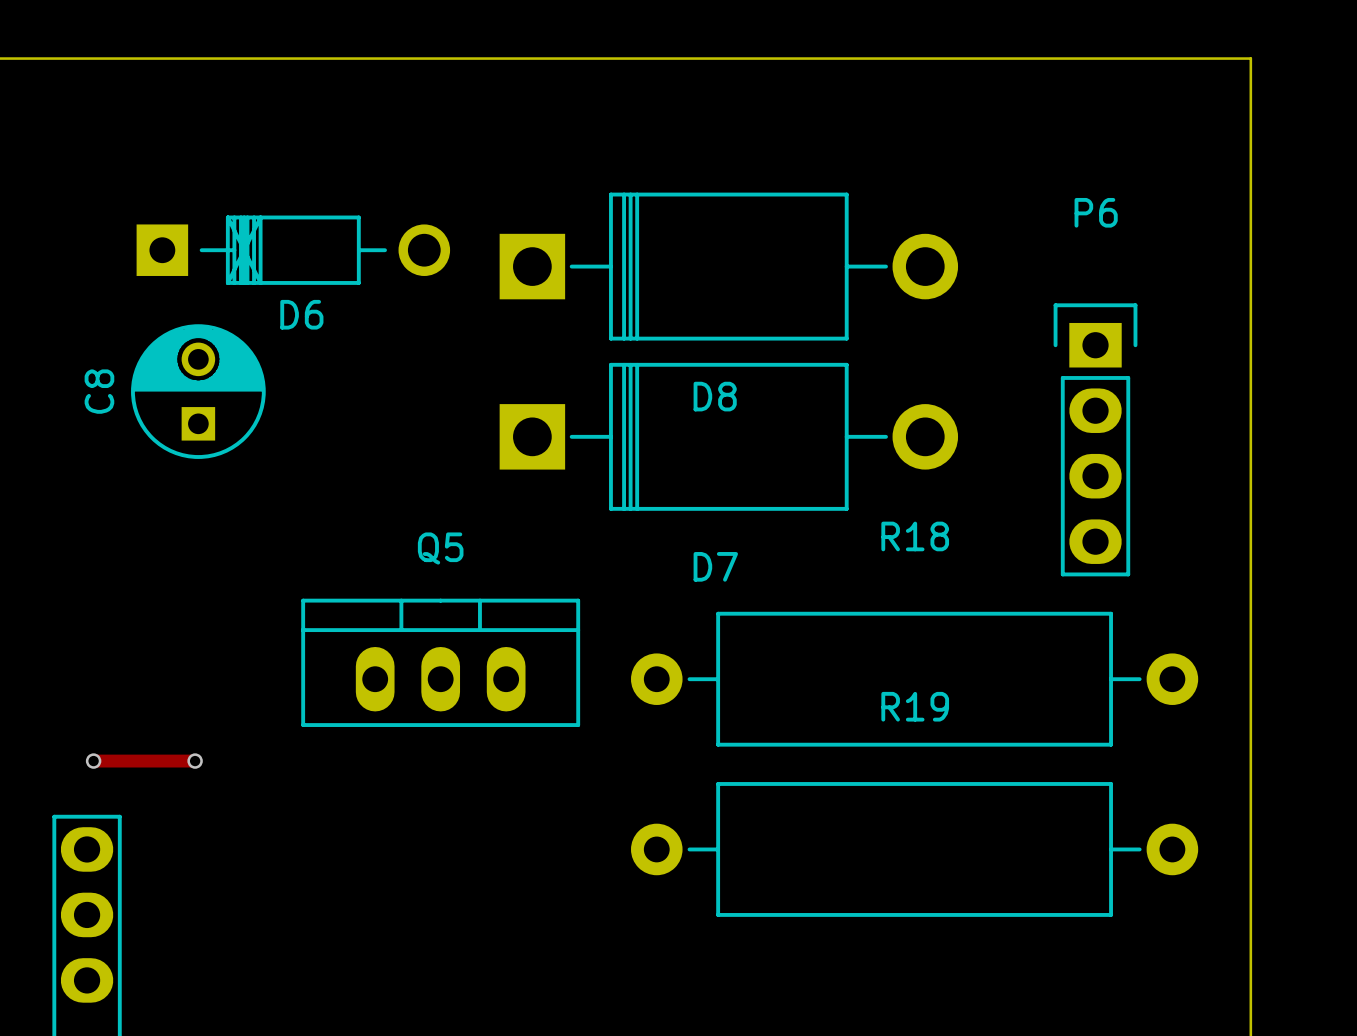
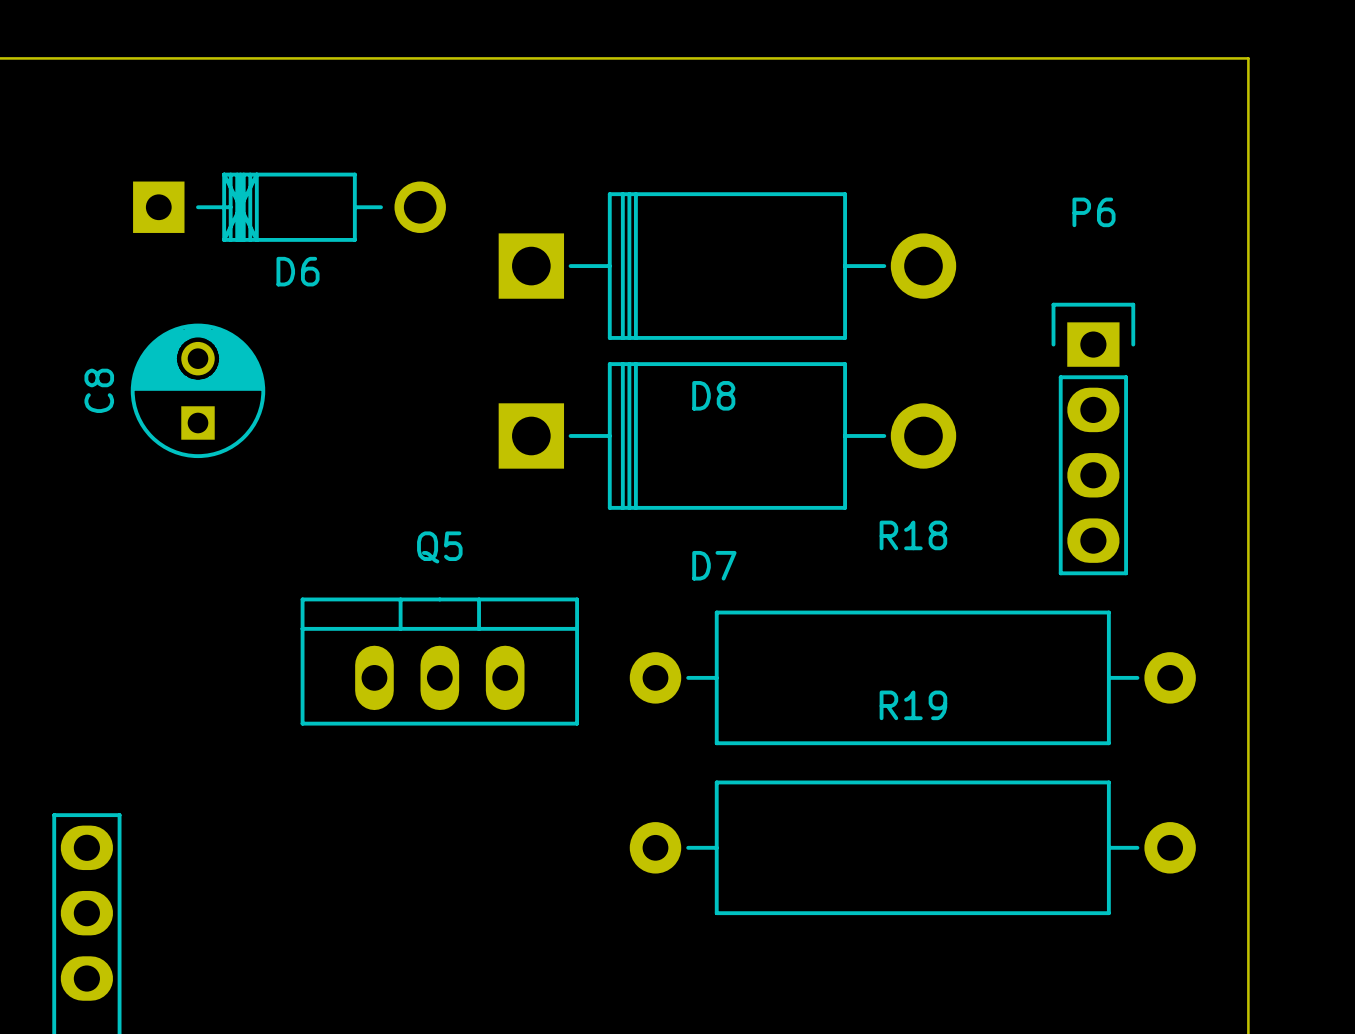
D6 position: (293, 250) -> (289, 207)
track: (93, 761) (195, 761) -> none
via: (93, 761) -> none
via: (195, 761) -> none

